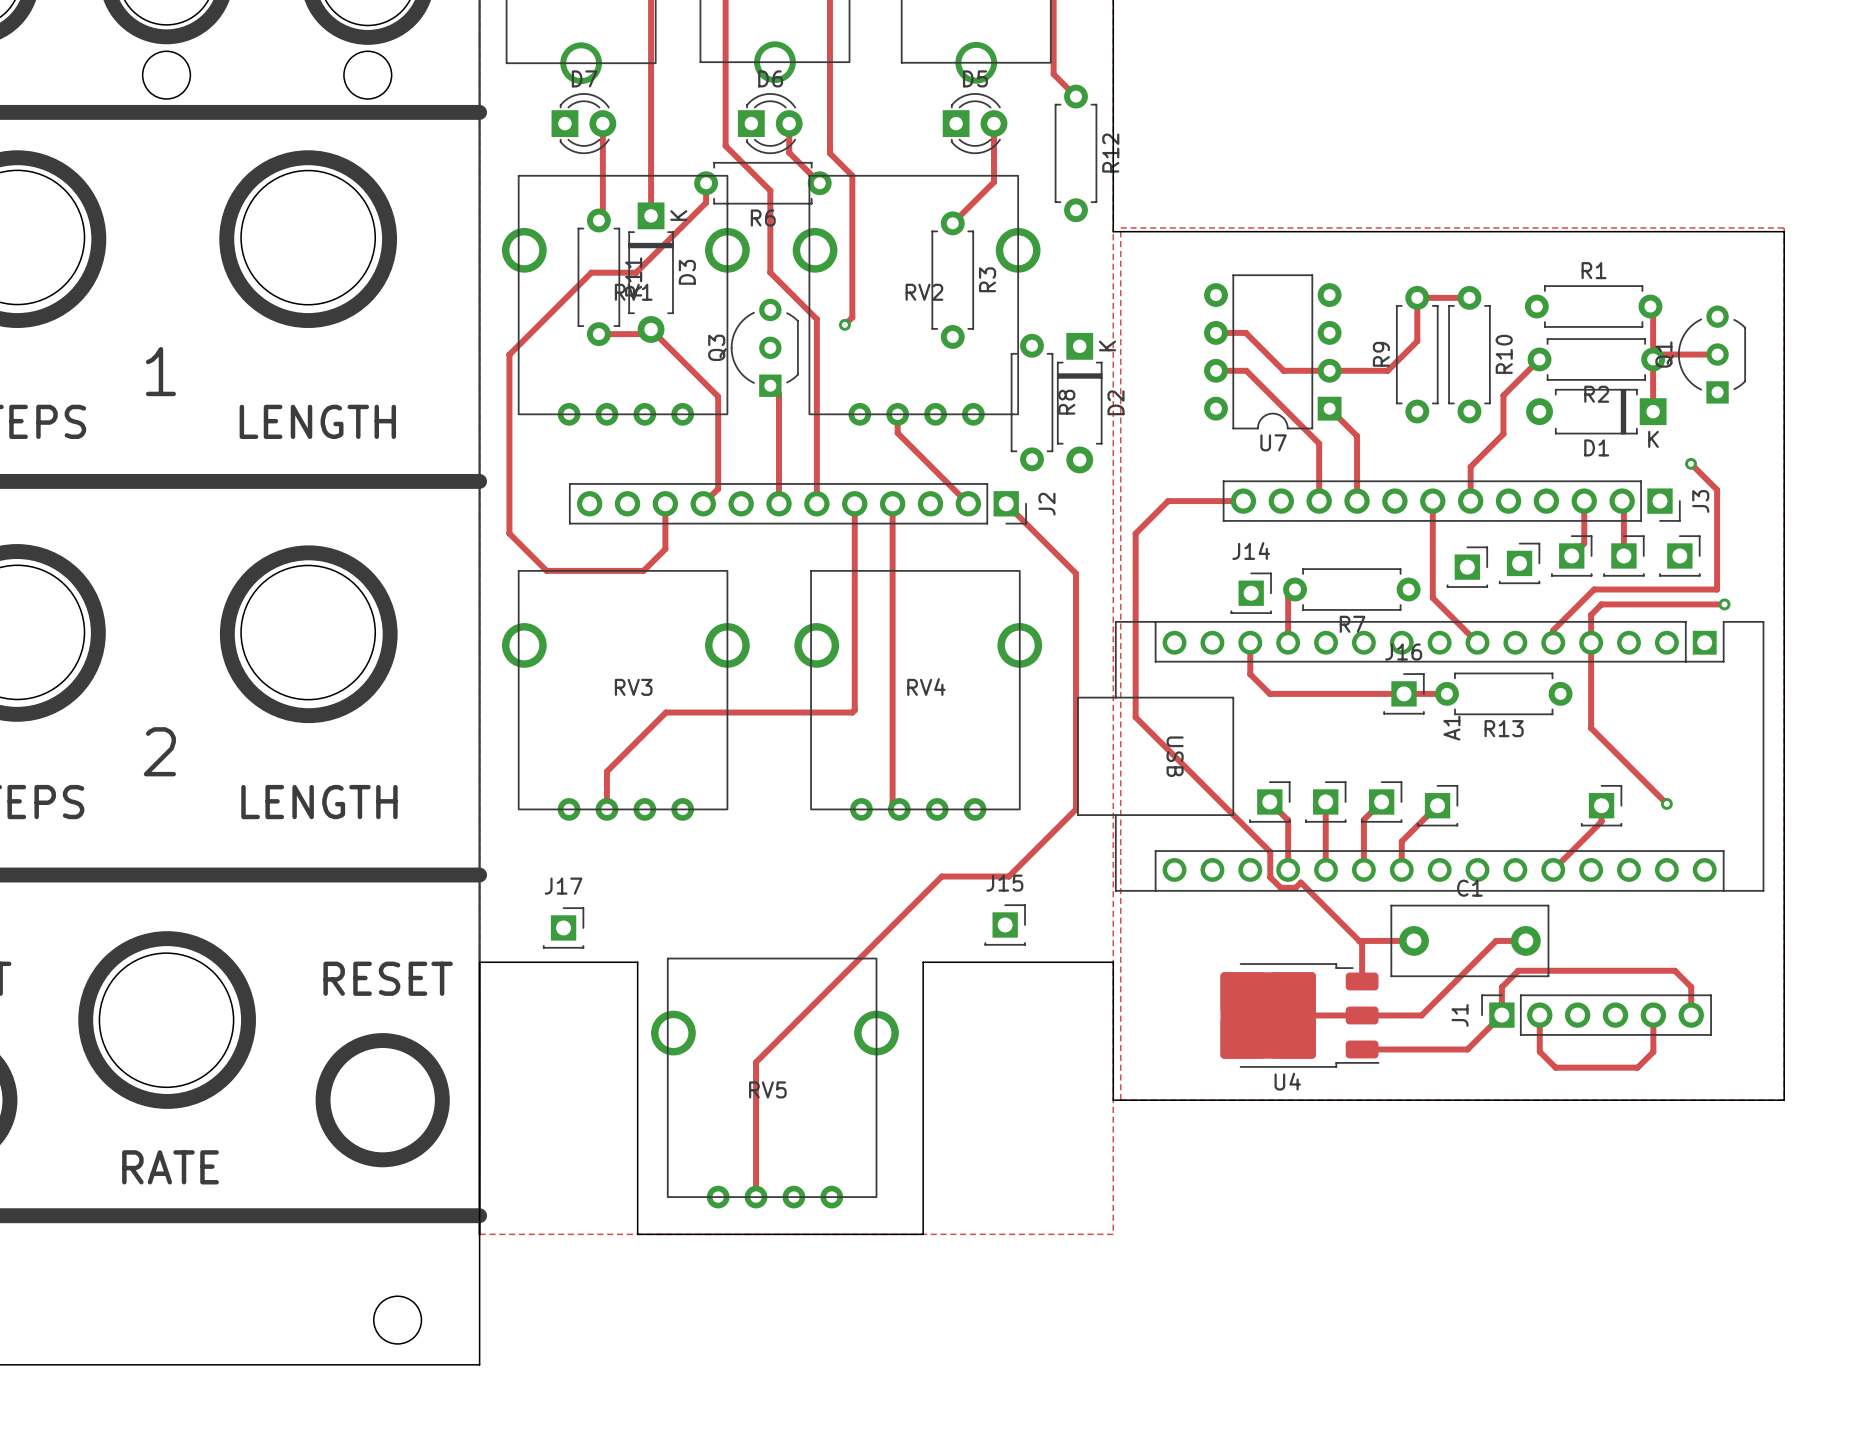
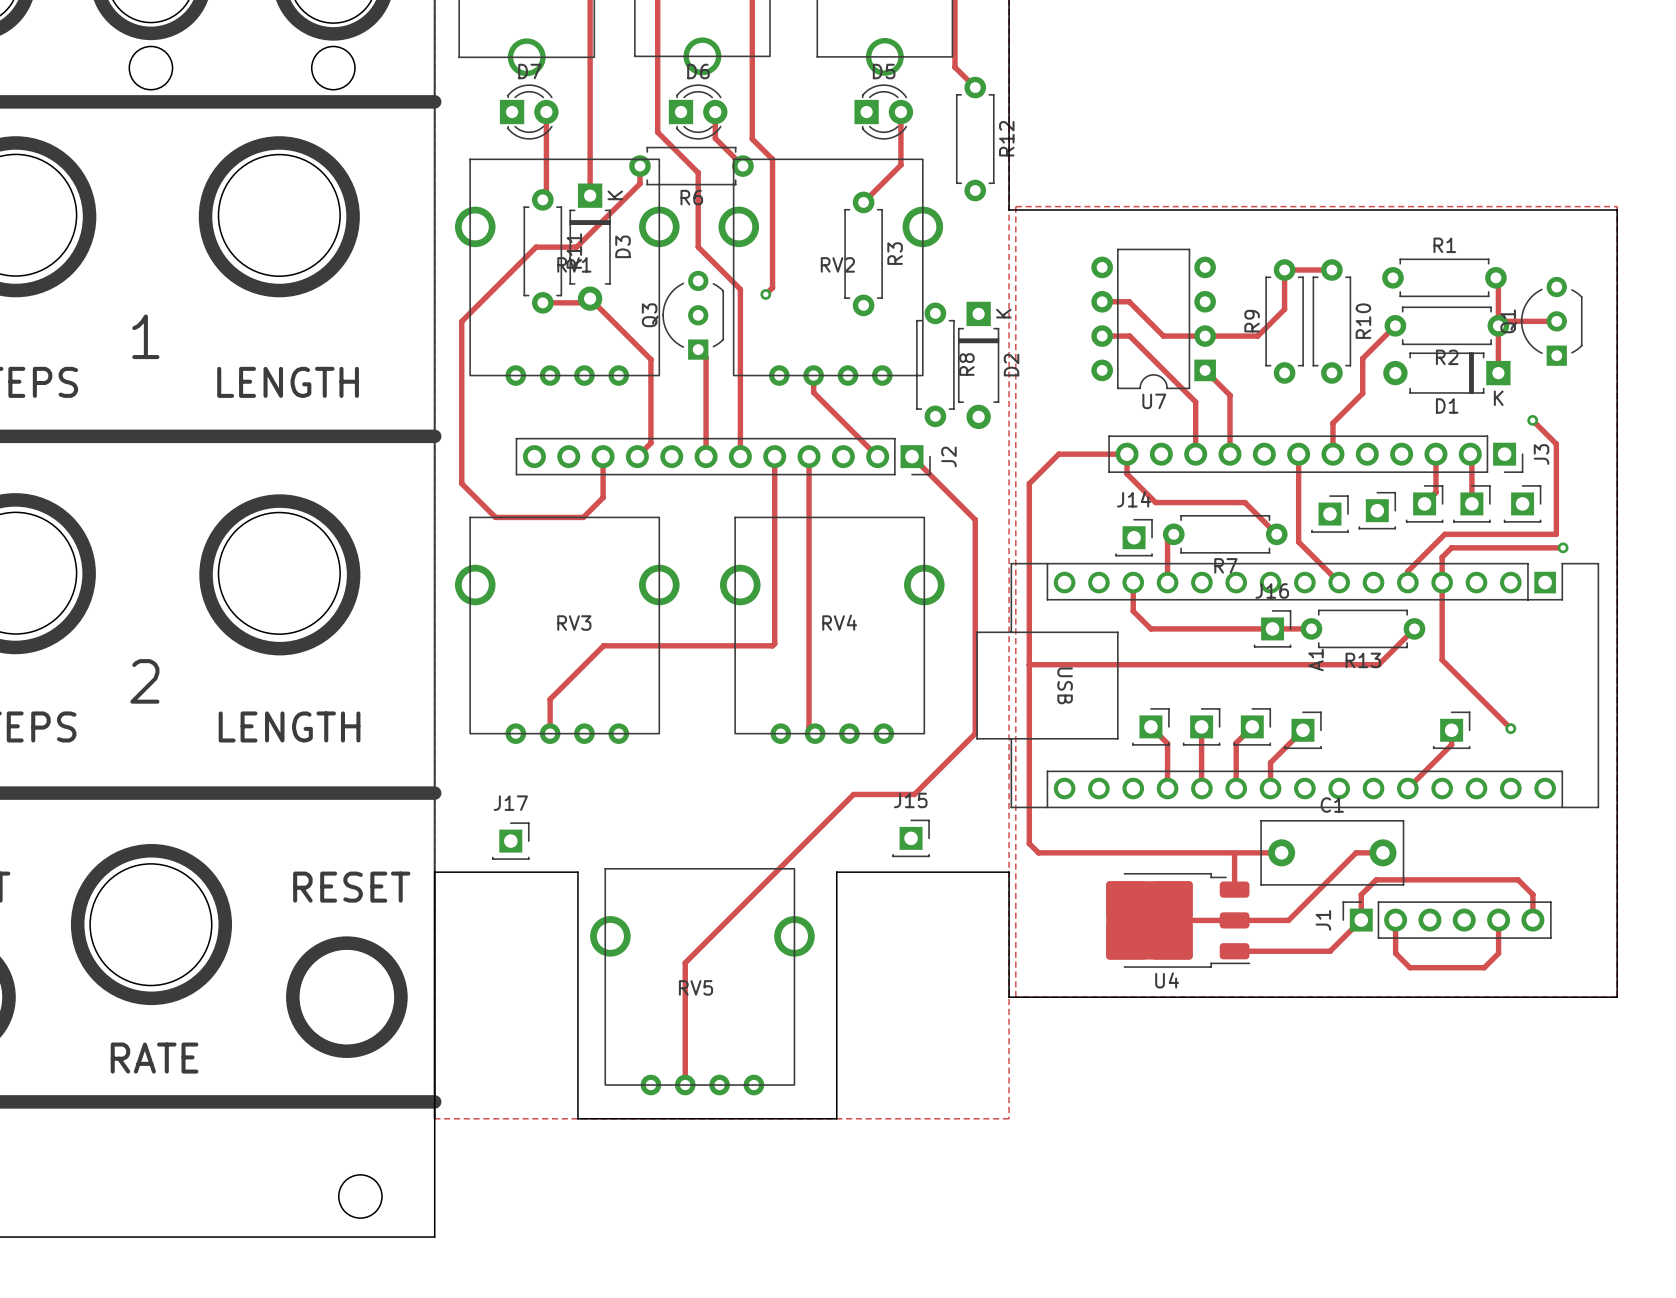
track: none -> (1127, 454) (1127, 473) (1155, 502) (1245, 502) (1276, 534)
track: none -> (1414, 628) (1378, 664) (1029, 664)
track: (1135, 717) (1270, 851) (1270, 877) (1280, 887) (1295, 887) (1300, 882) (1362, 943) -> (1029, 650) (1029, 843) (1038, 852) (1232, 852)

